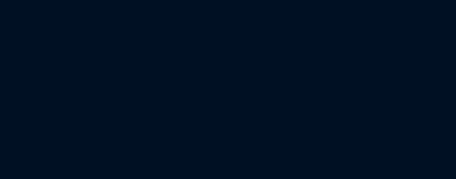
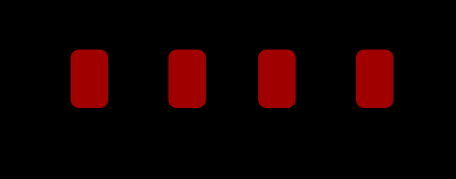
part: none -> (138, 78)
part: none -> (325, 78)

